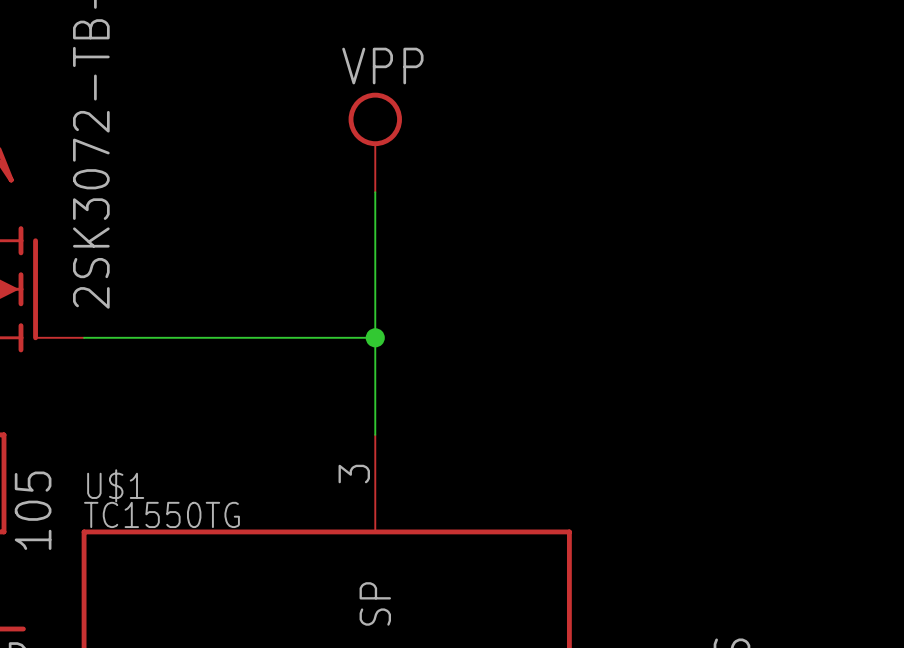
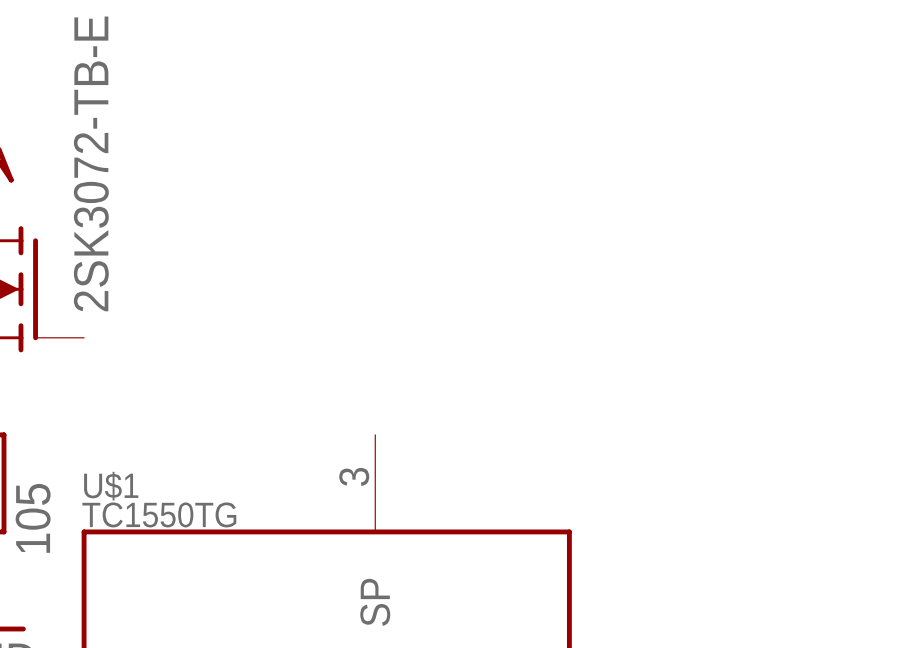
power symbol: VPP (375, 142) -> none
wire: (375, 192) (375, 434) -> none
wire: (84, 337) (375, 337) -> none
junction: (375, 337) -> none

